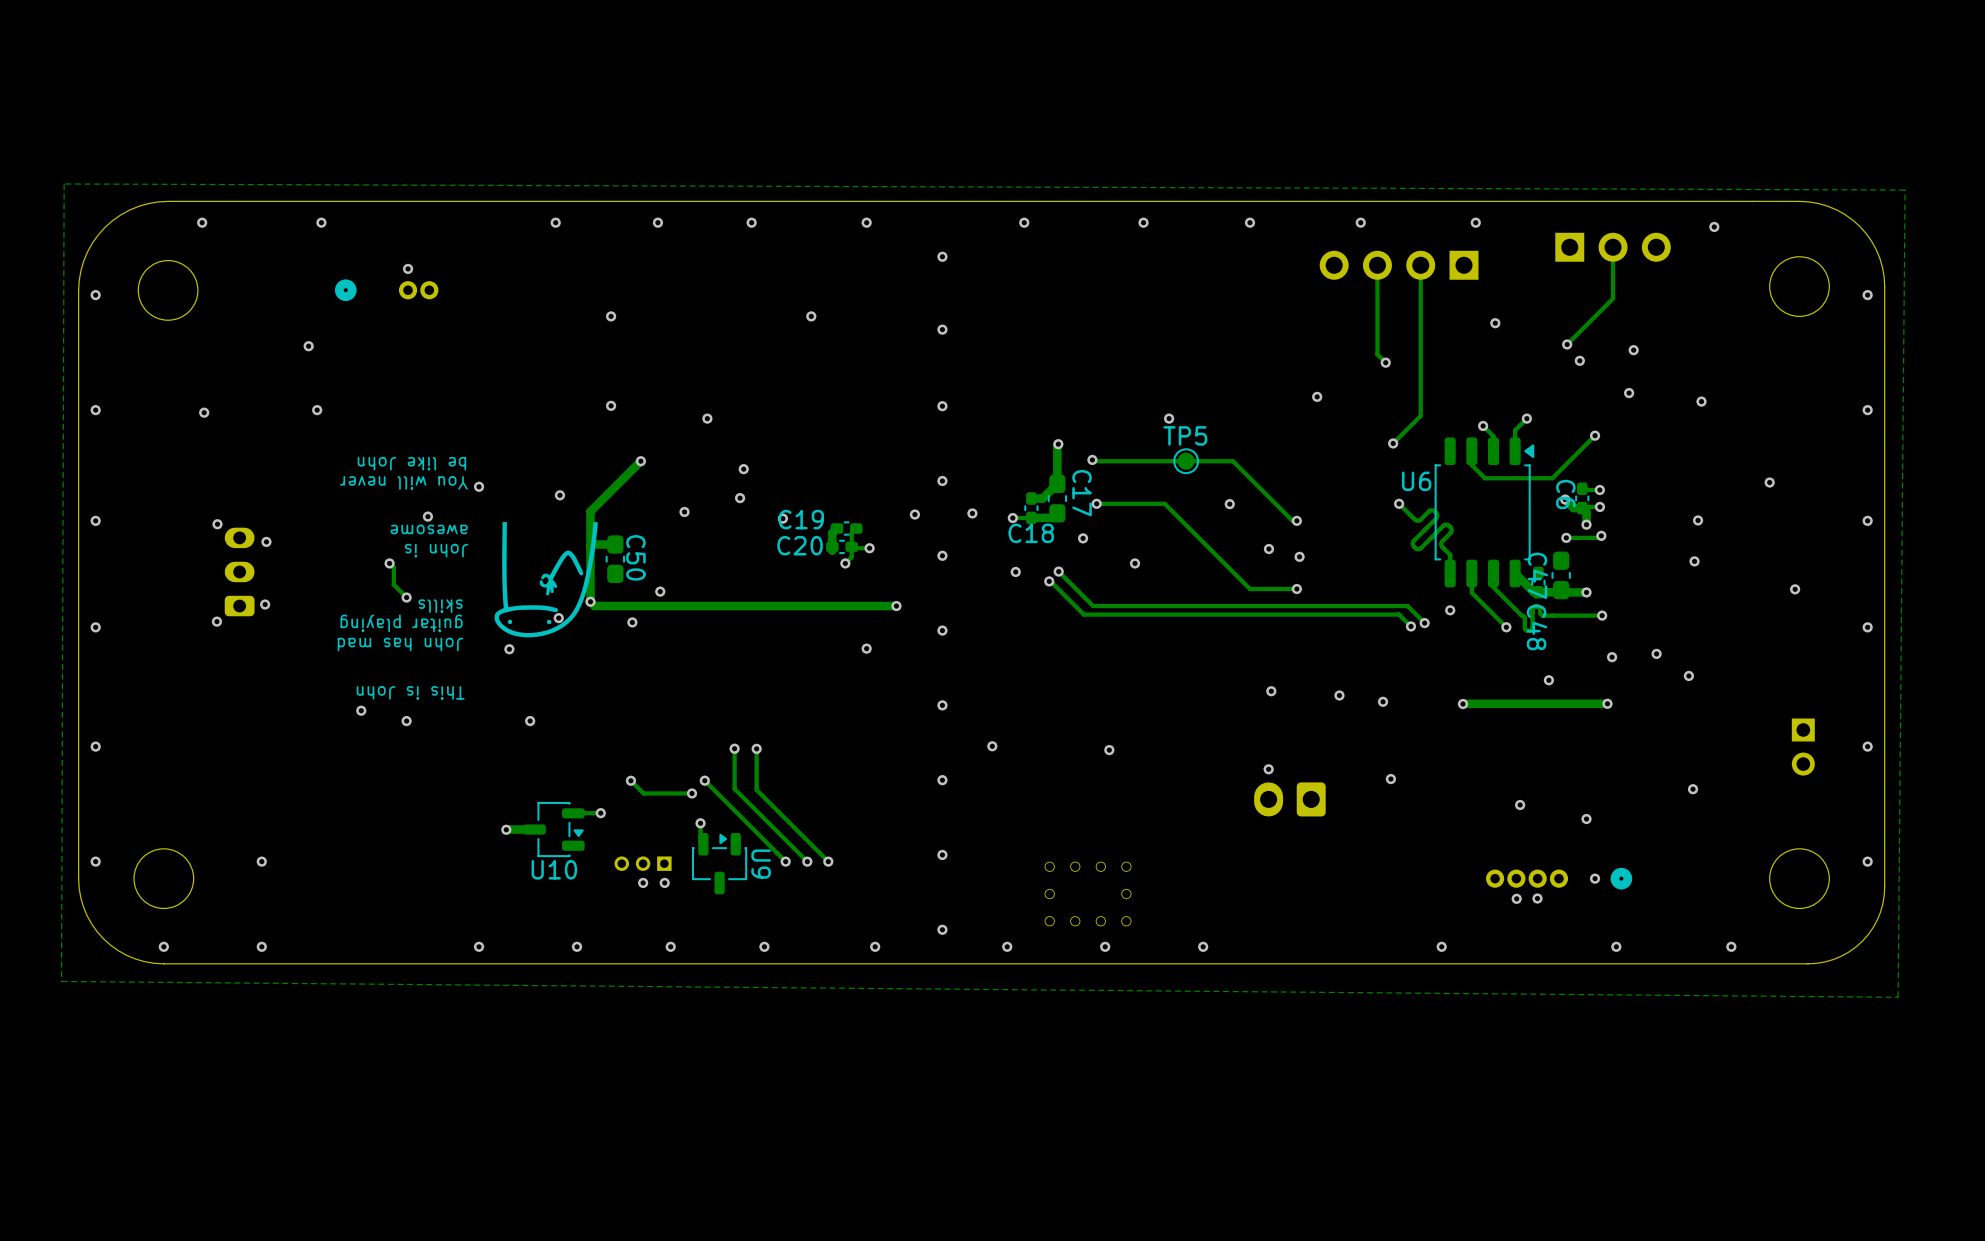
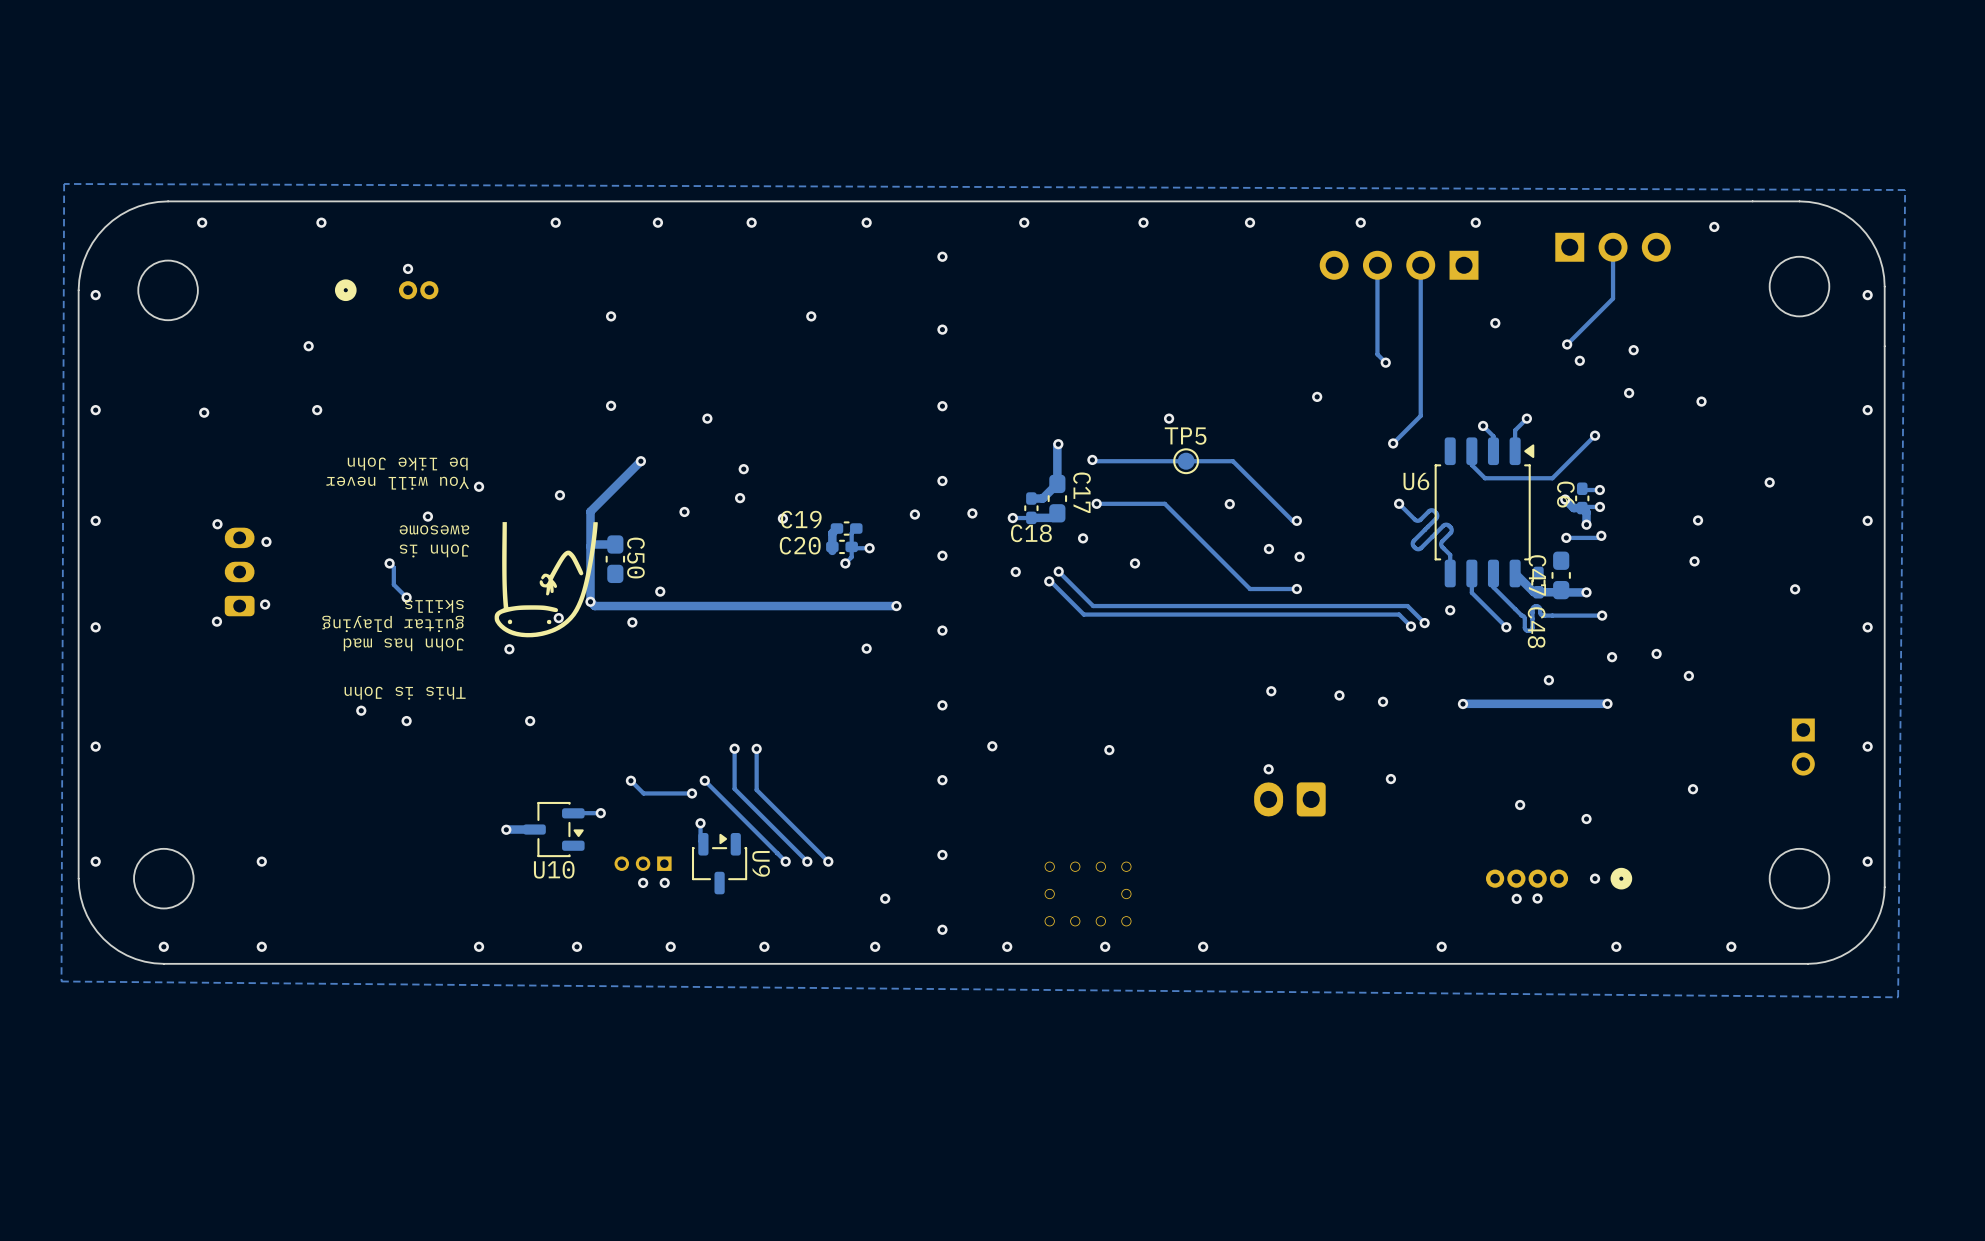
via: none -> (885, 898)

